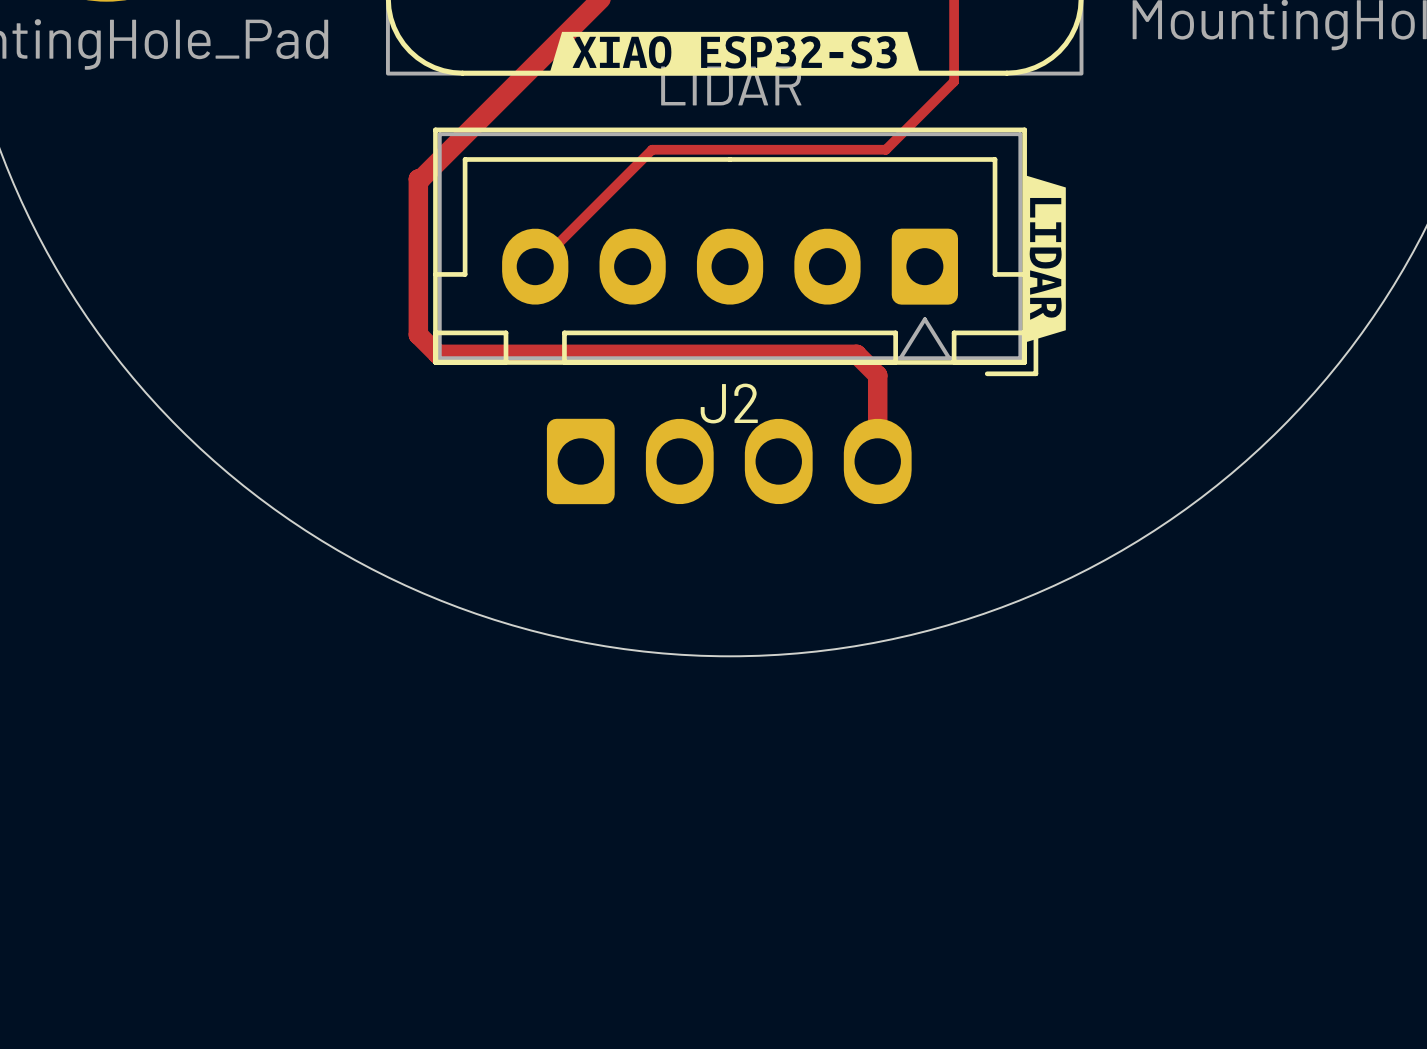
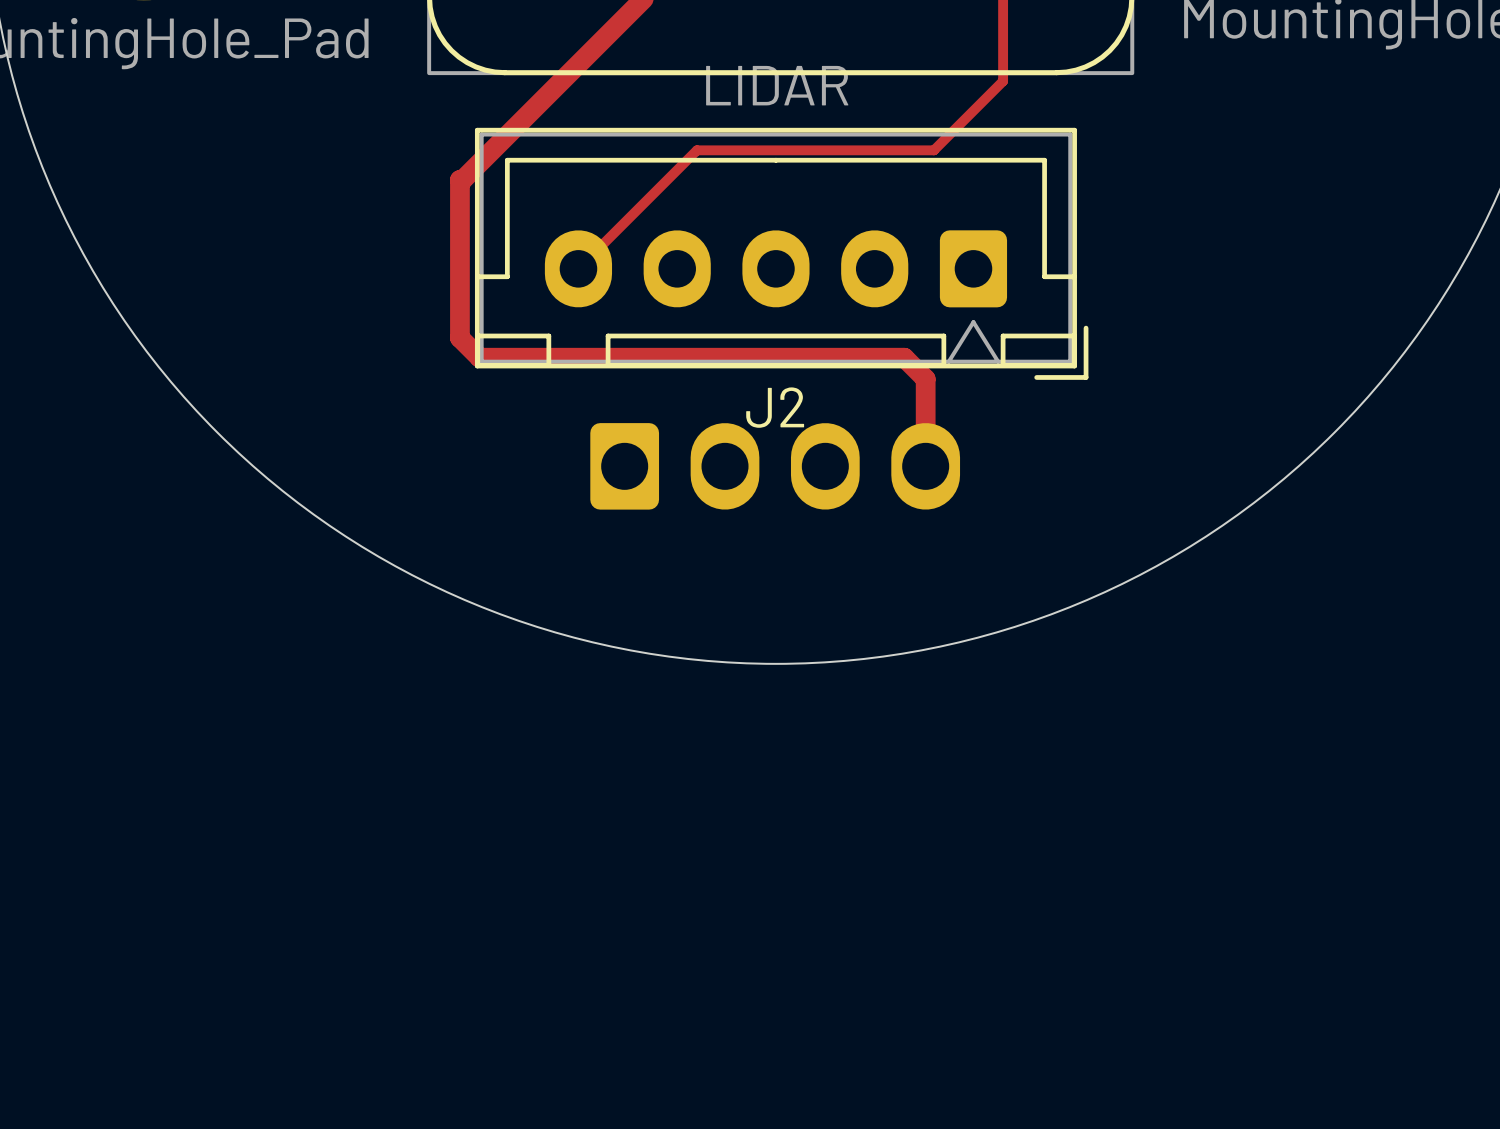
drawing: [549, 31, 920, 73] -> none
drawing: [1025, 175, 1066, 343] -> none

